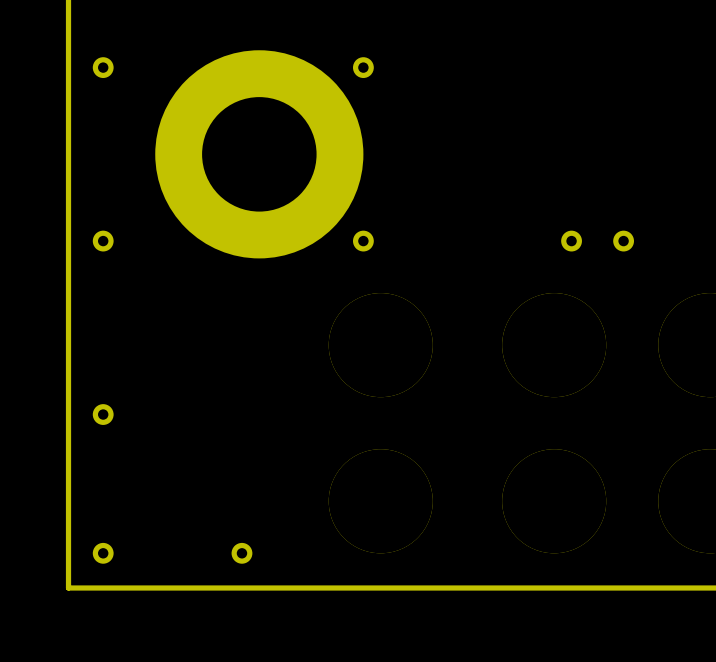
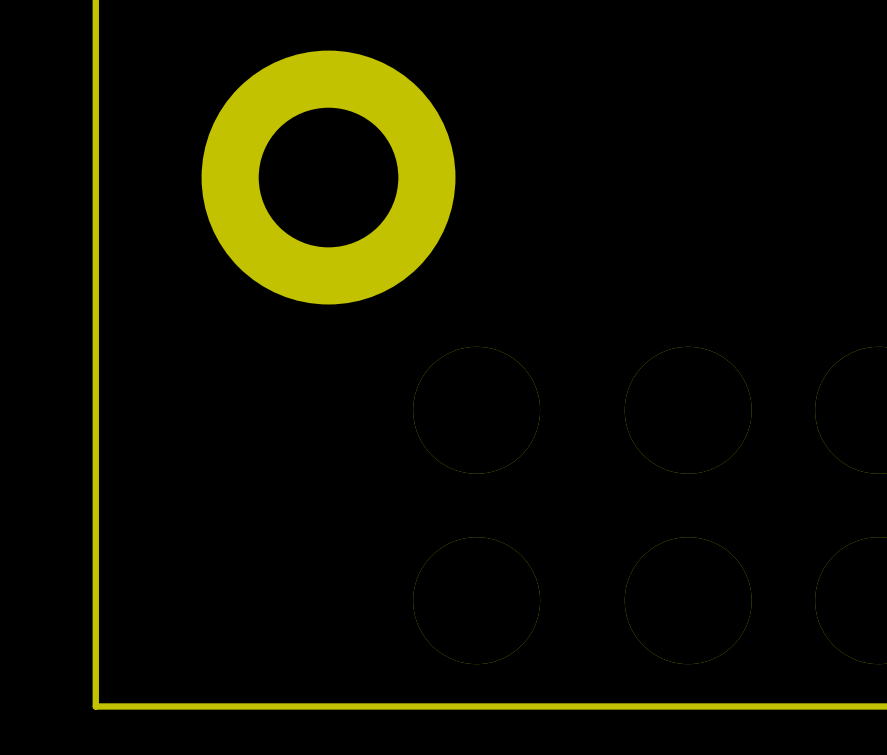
part: (103, 67) -> none
part: (363, 67) -> none
part: (103, 241) -> none
part: (363, 241) -> none
part: (571, 241) -> none
part: (623, 241) -> none
part: (103, 414) -> none
part: (103, 553) -> none
part: (241, 553) -> none

